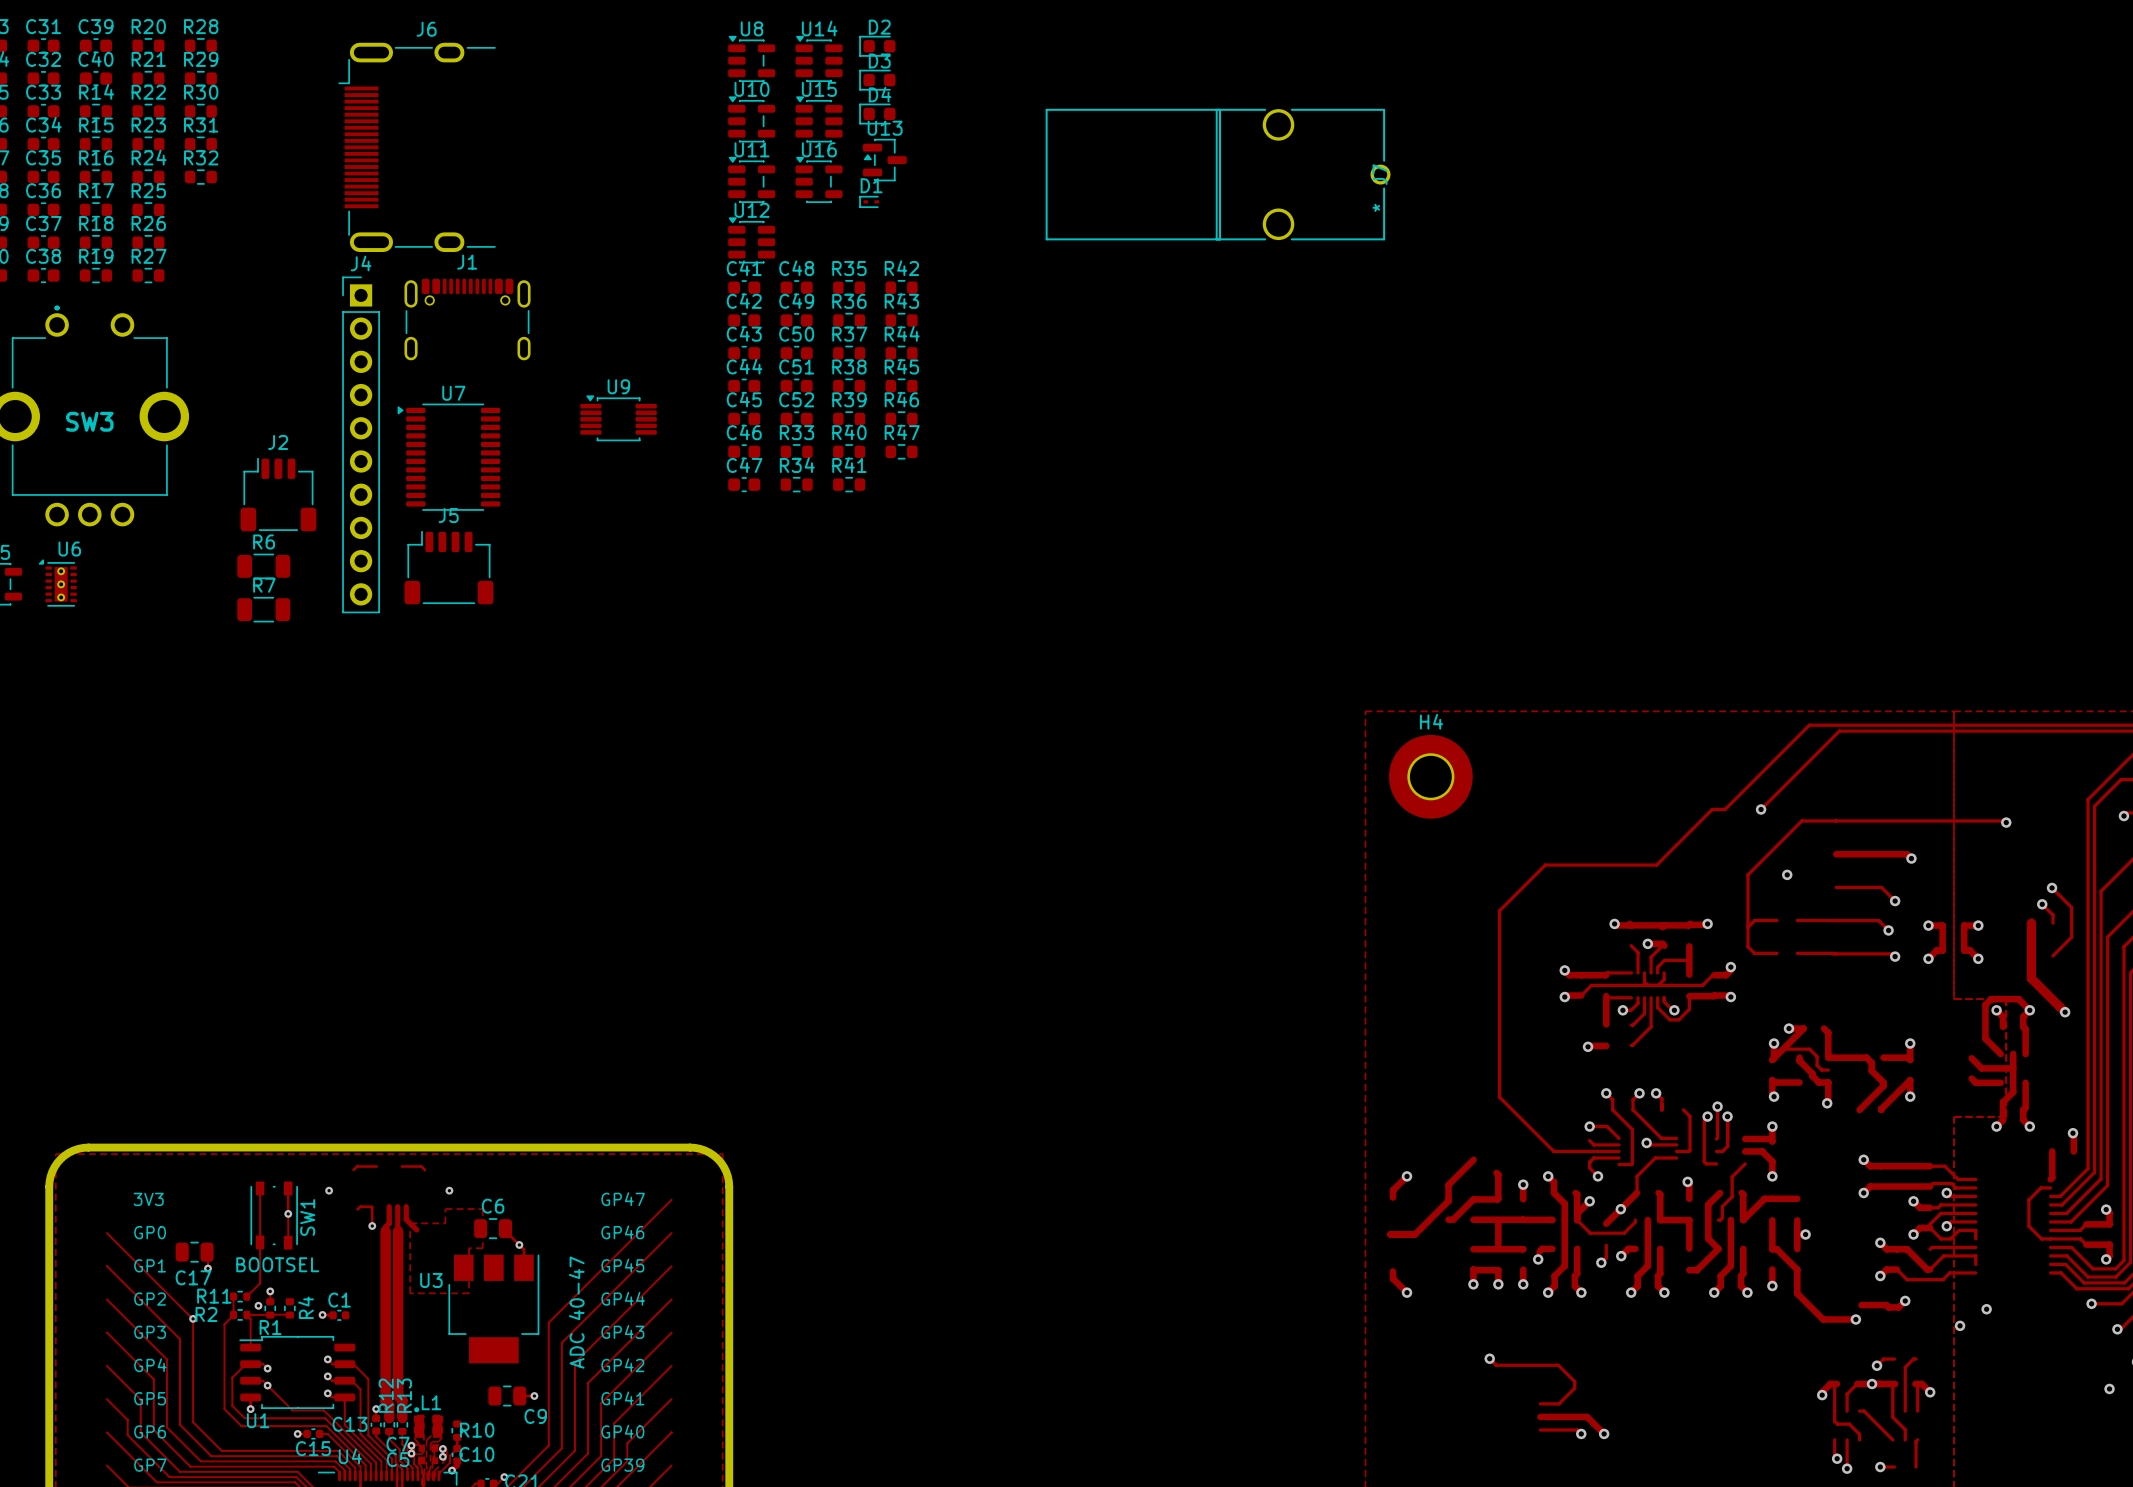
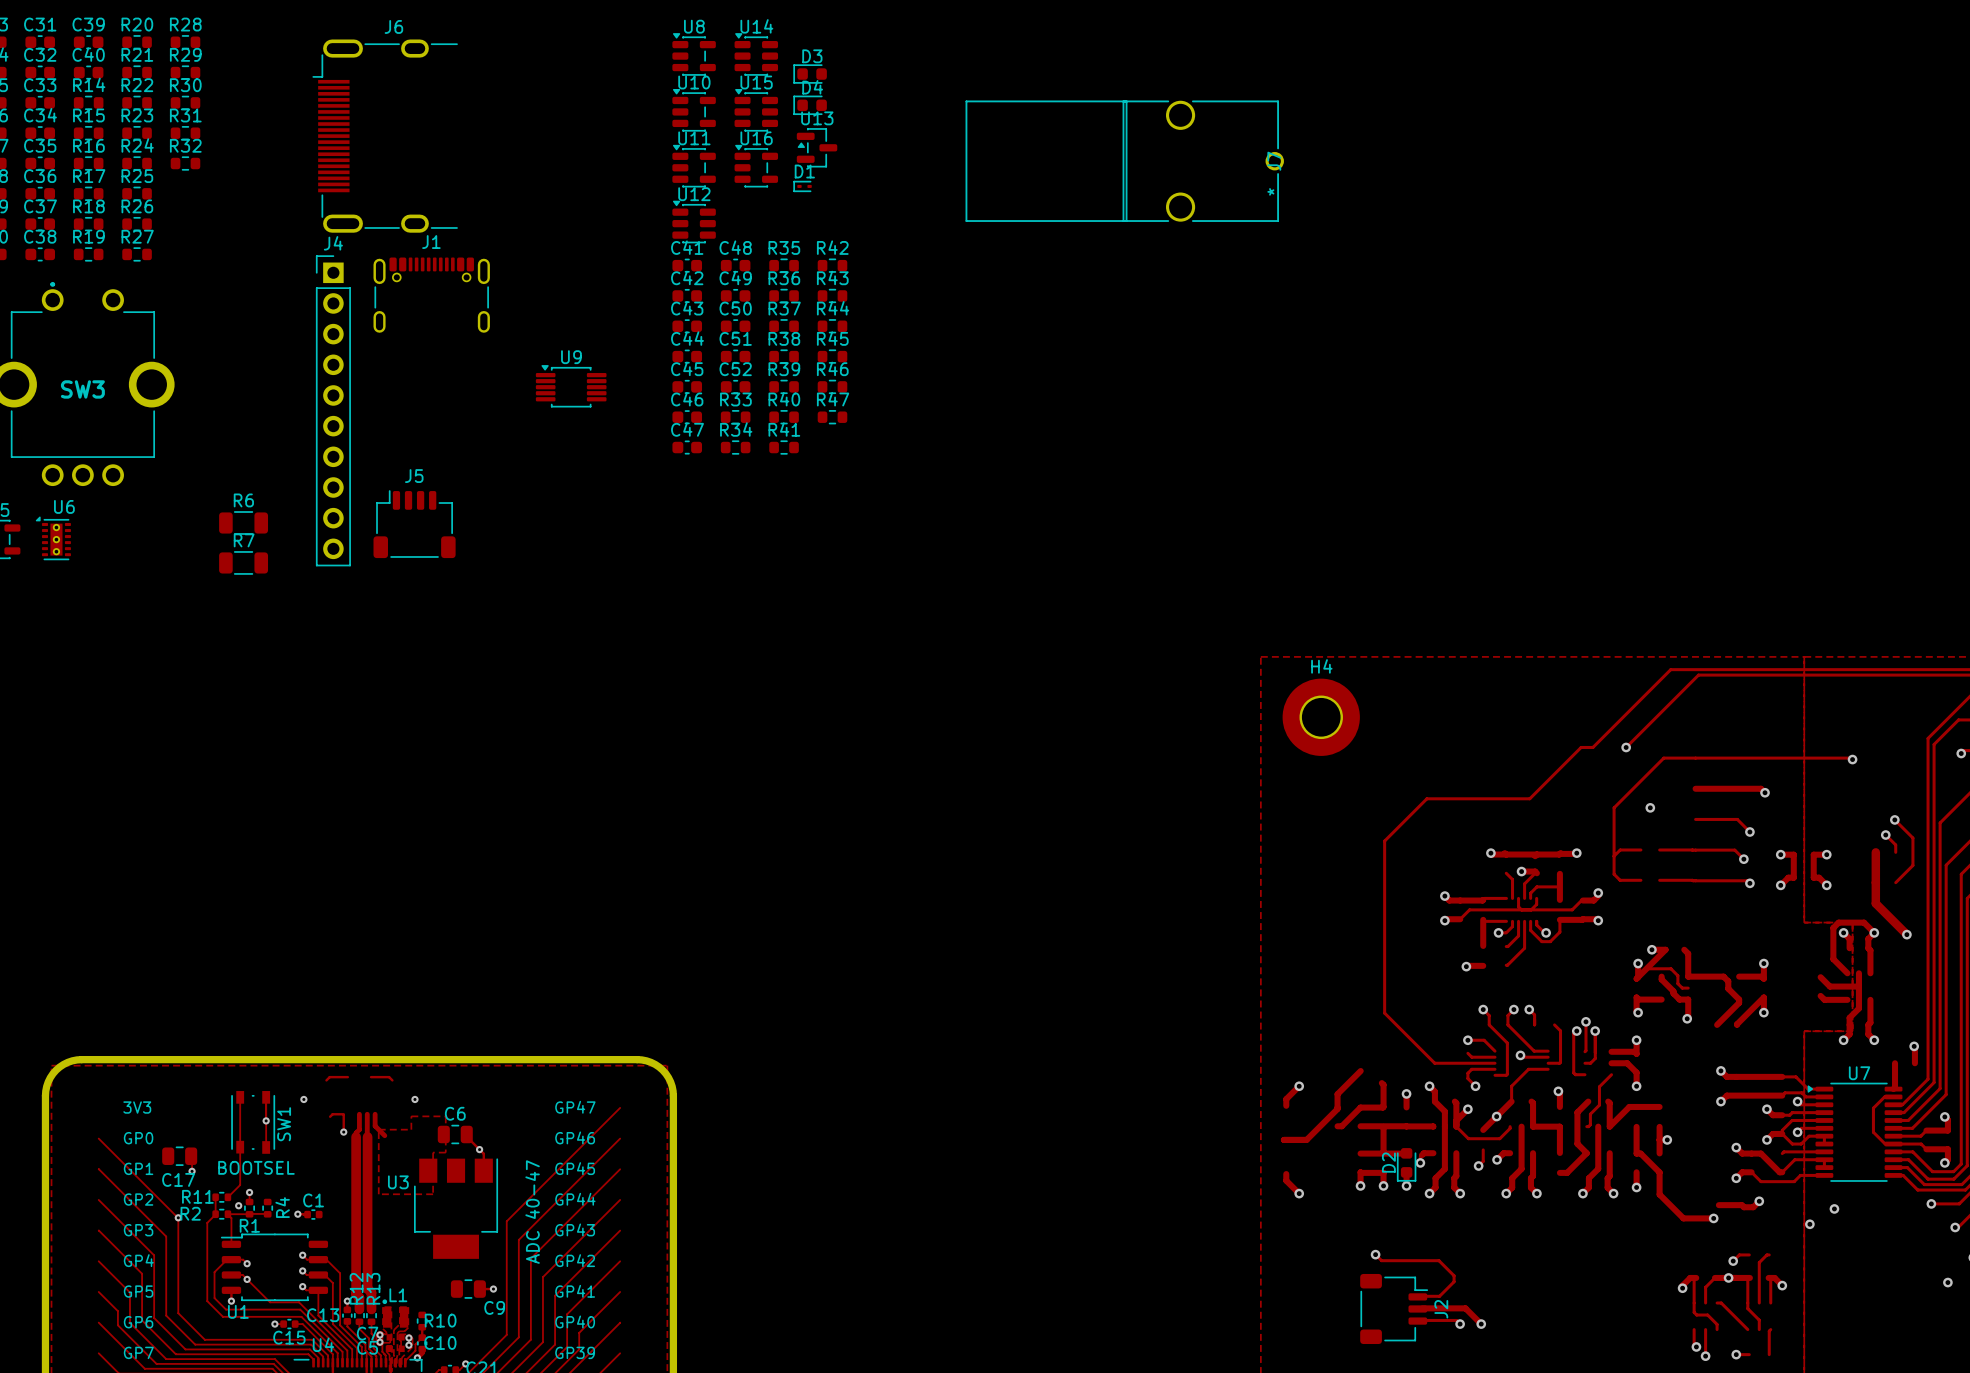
D2 rotation: 0° (877, 46) -> 90° counterclockwise (1406, 1164)
D2 position: (877, 46) -> (1406, 1164)
U7 position: (448, 457) -> (1855, 1132)
J2 rotation: 0° (278, 494) -> 90° clockwise (1394, 1308)
J2 position: (278, 494) -> (1394, 1308)

